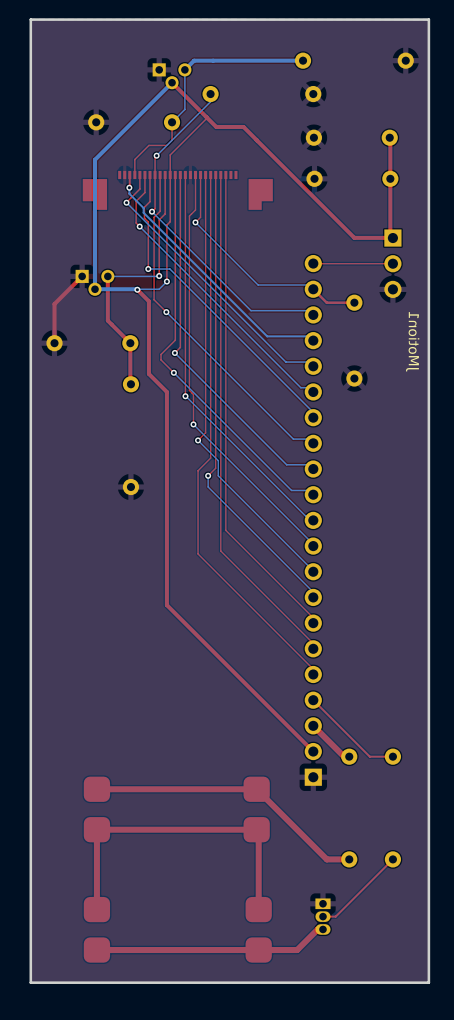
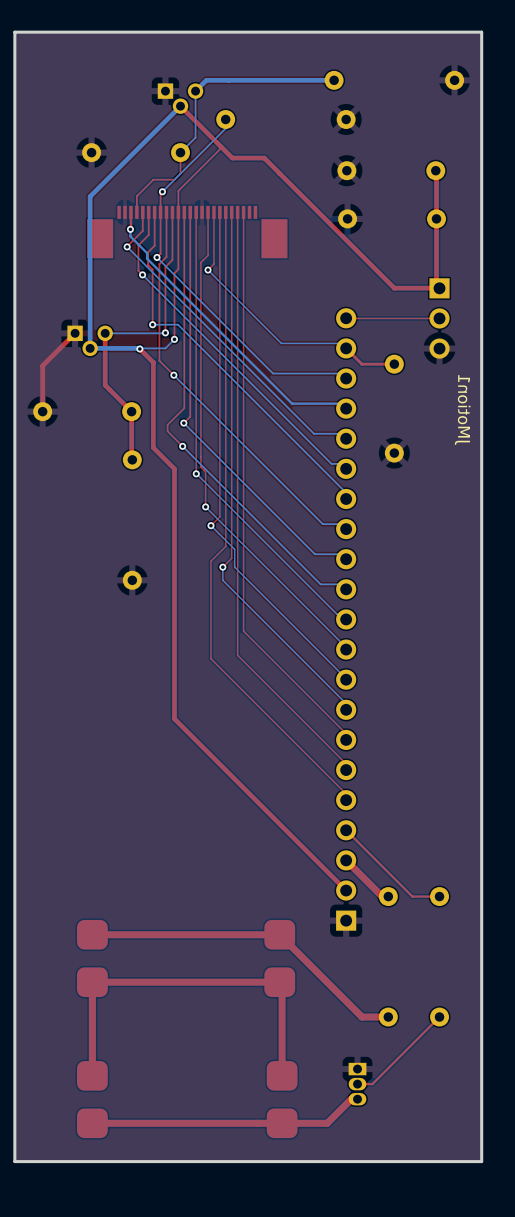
part footprint: [82, 170, 273, 210] -> [87, 205, 288, 259]

